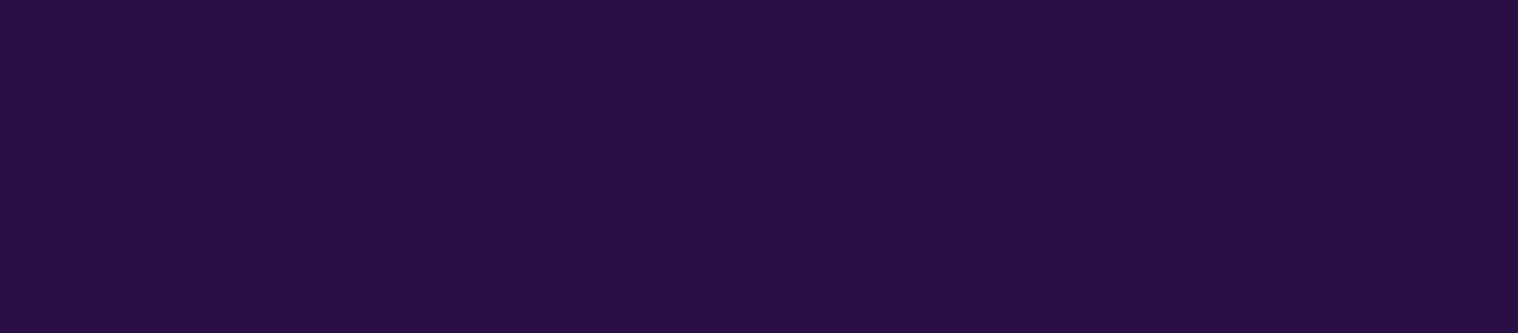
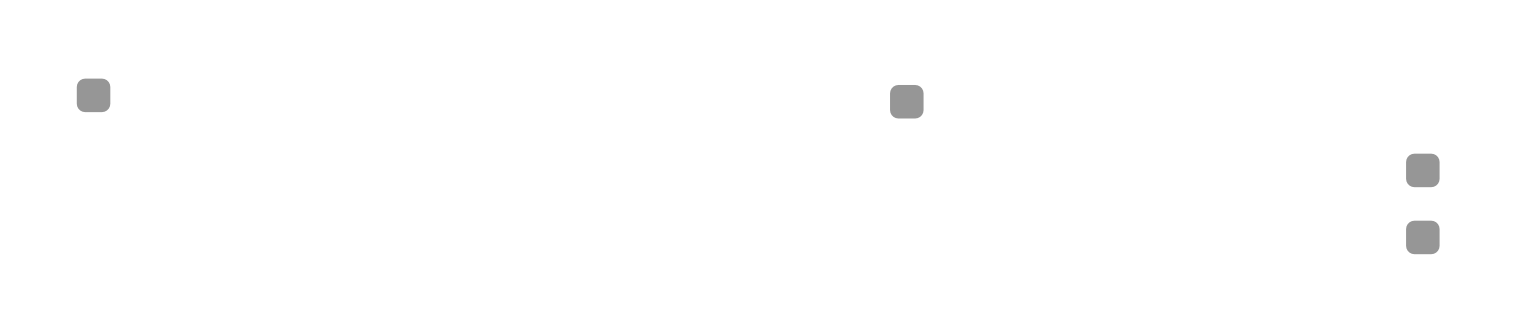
part: none -> (93, 95)
part: none -> (906, 101)
part: none -> (1422, 170)
part: none -> (1422, 237)

